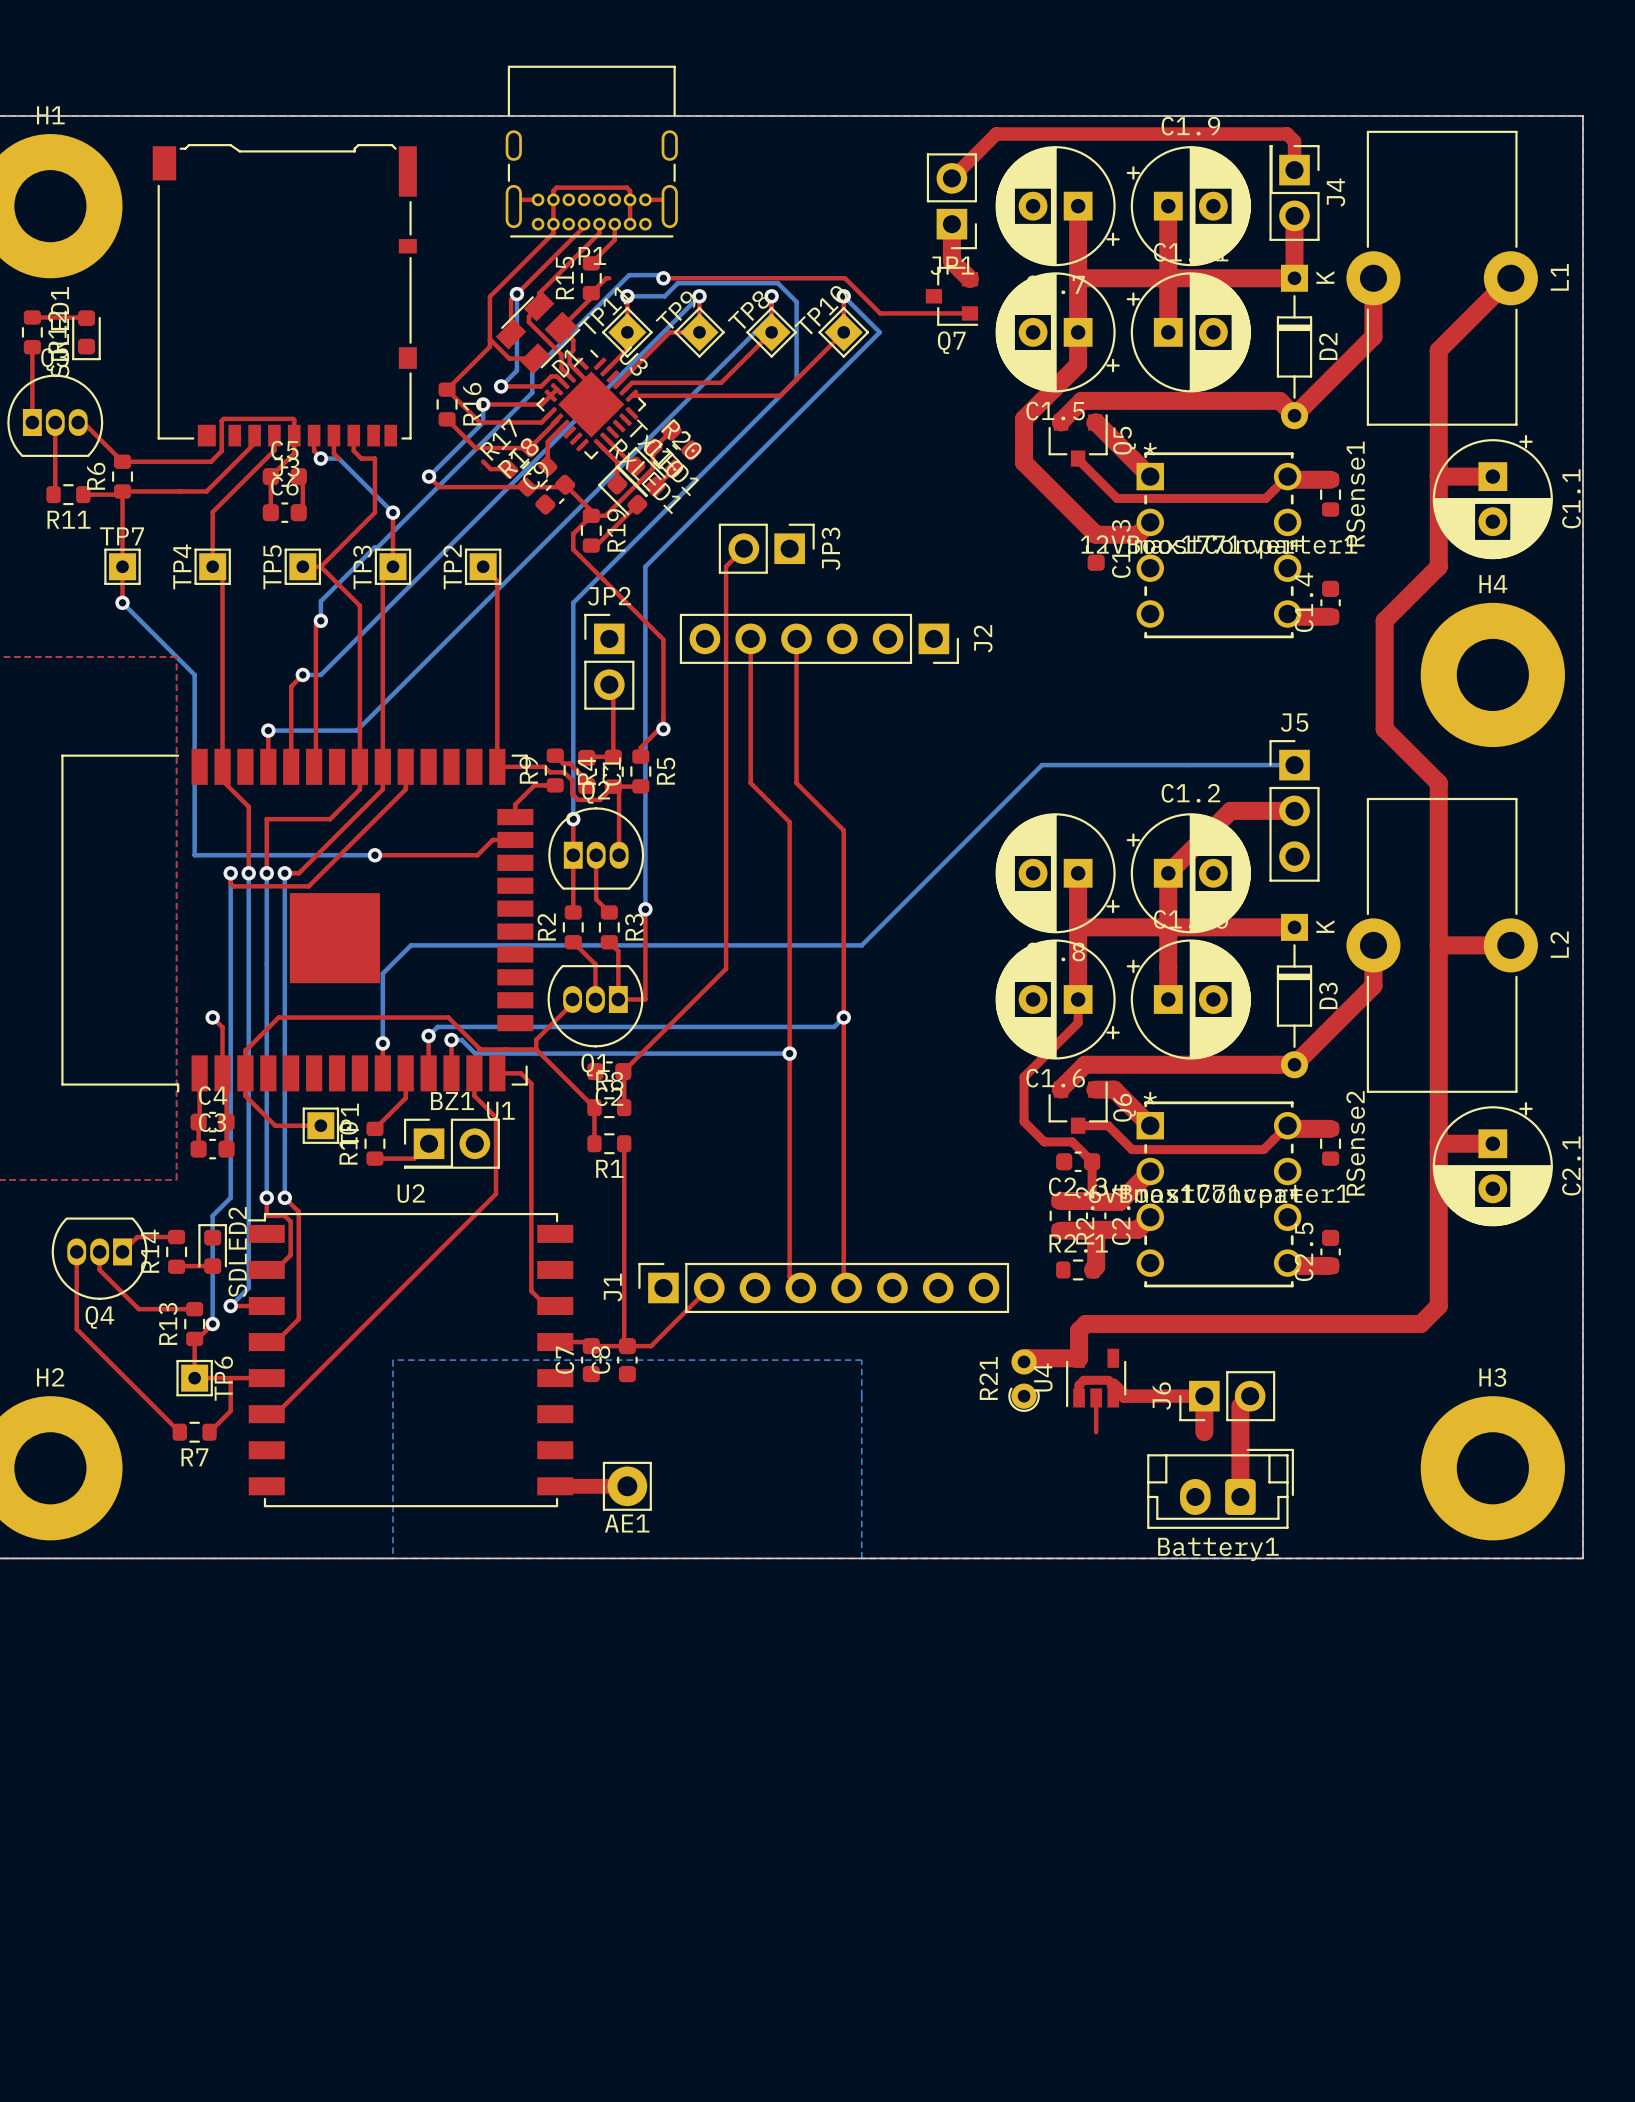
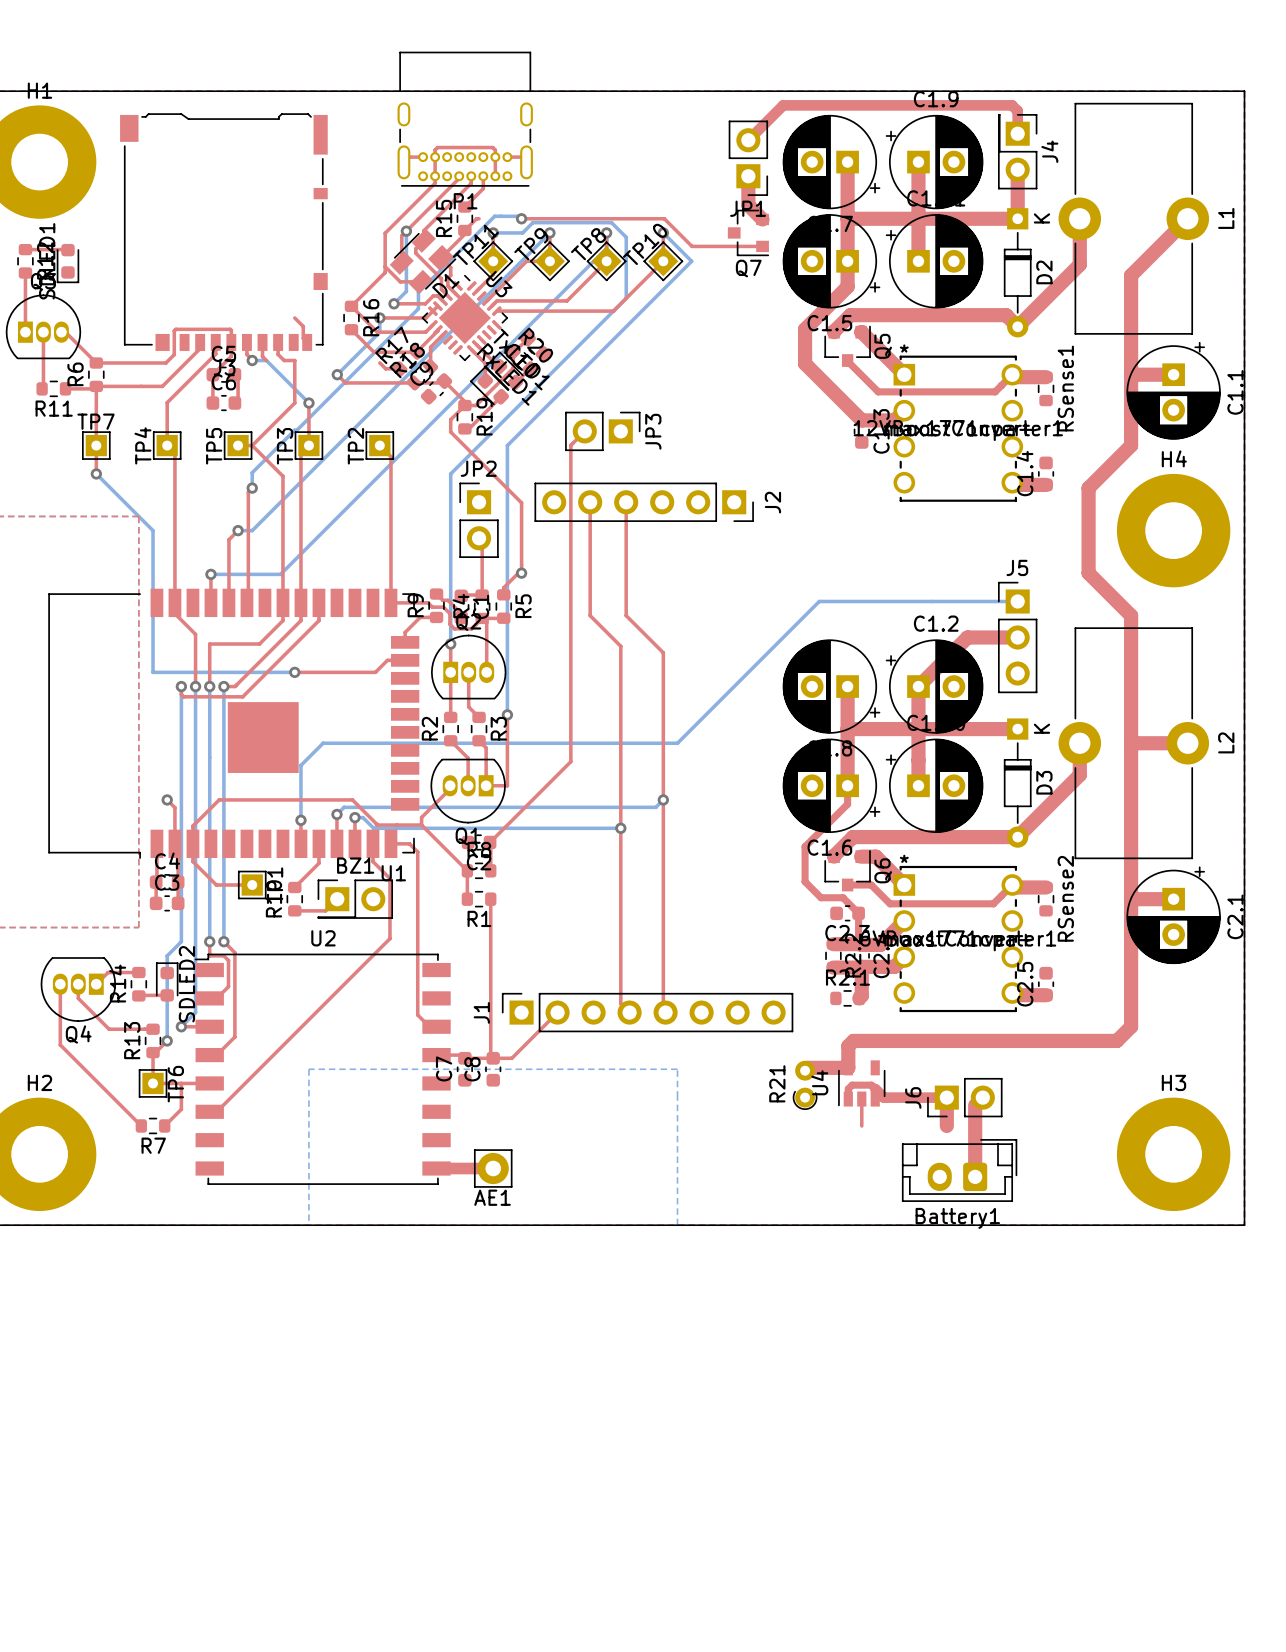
top track: none -> (294, 317) (303, 326) (303, 338) (307, 342)

